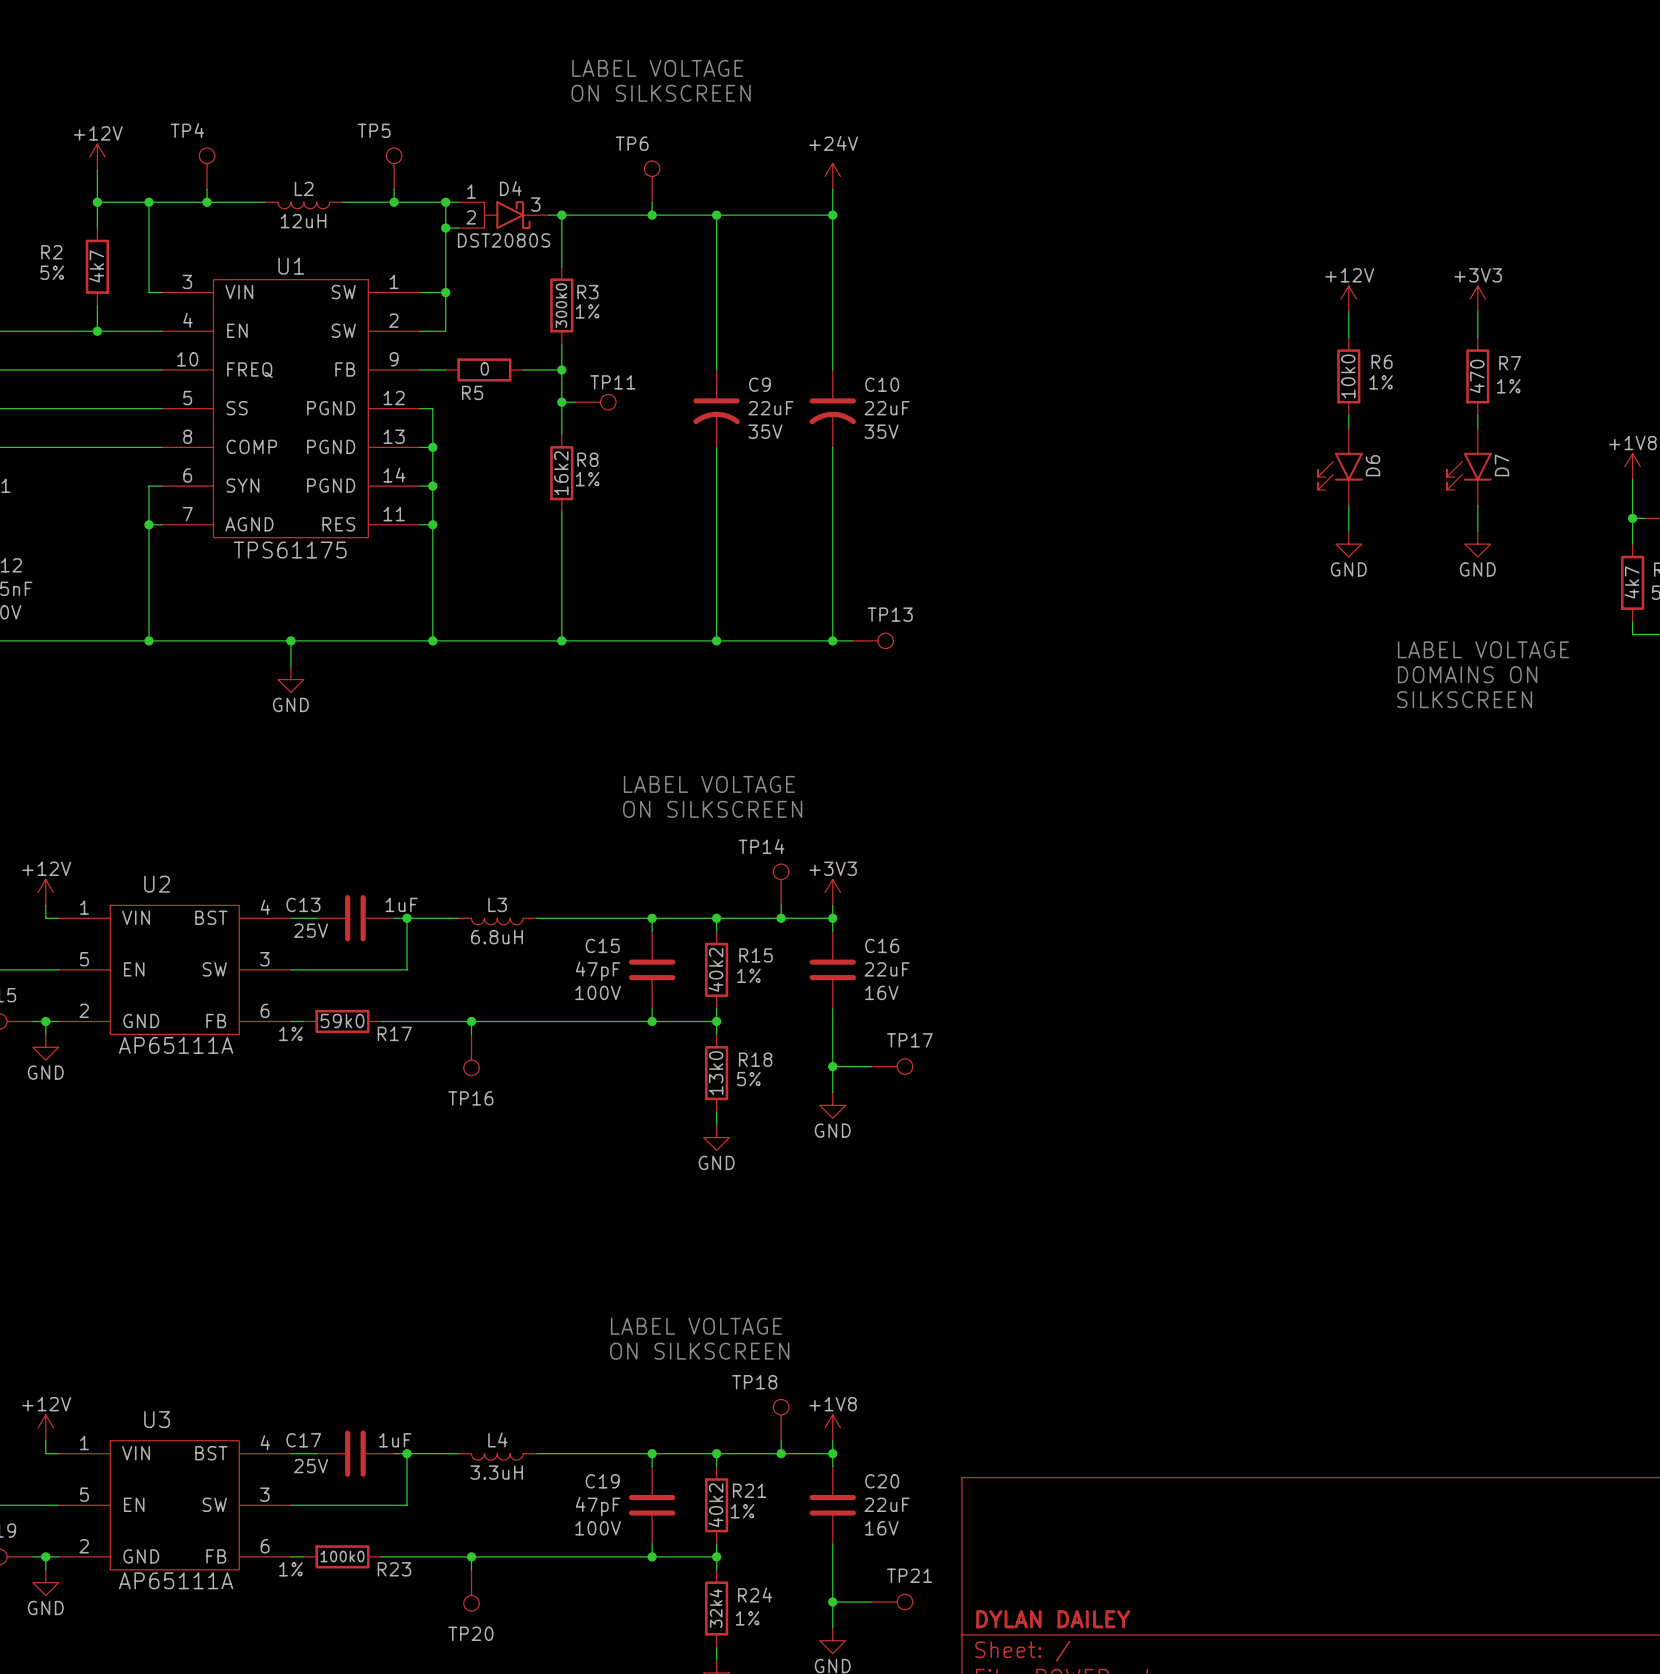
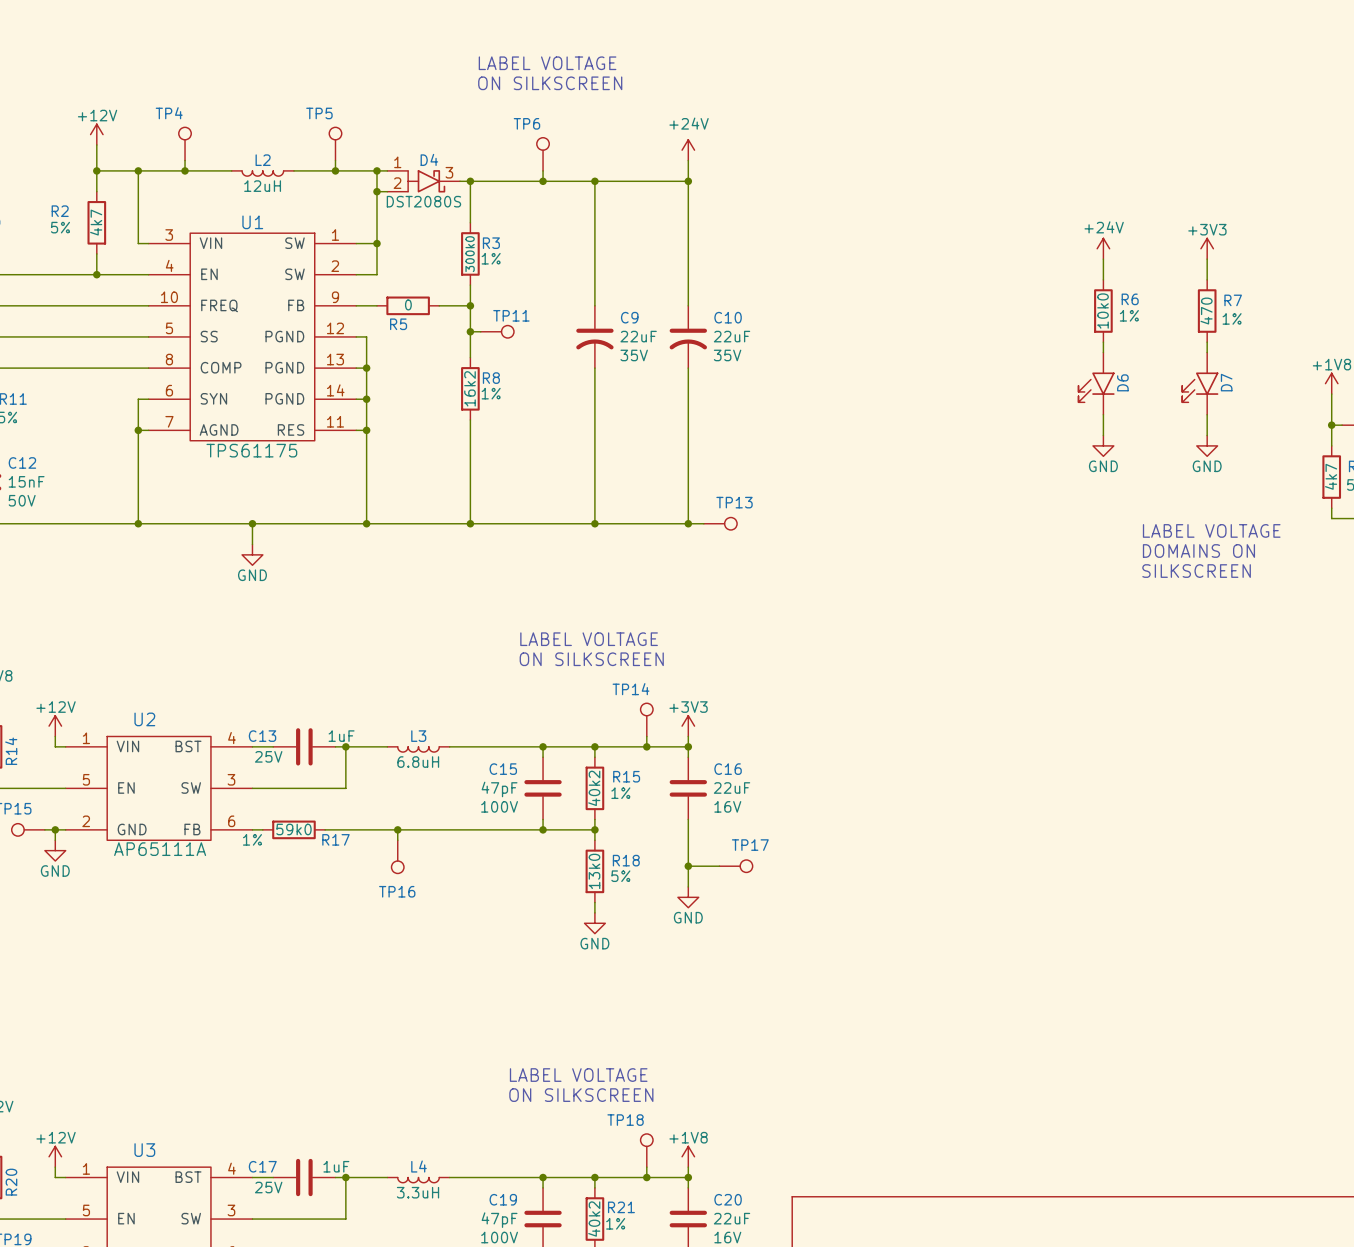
power symbol: +12V (1348, 299) -> +24V (1103, 248)

